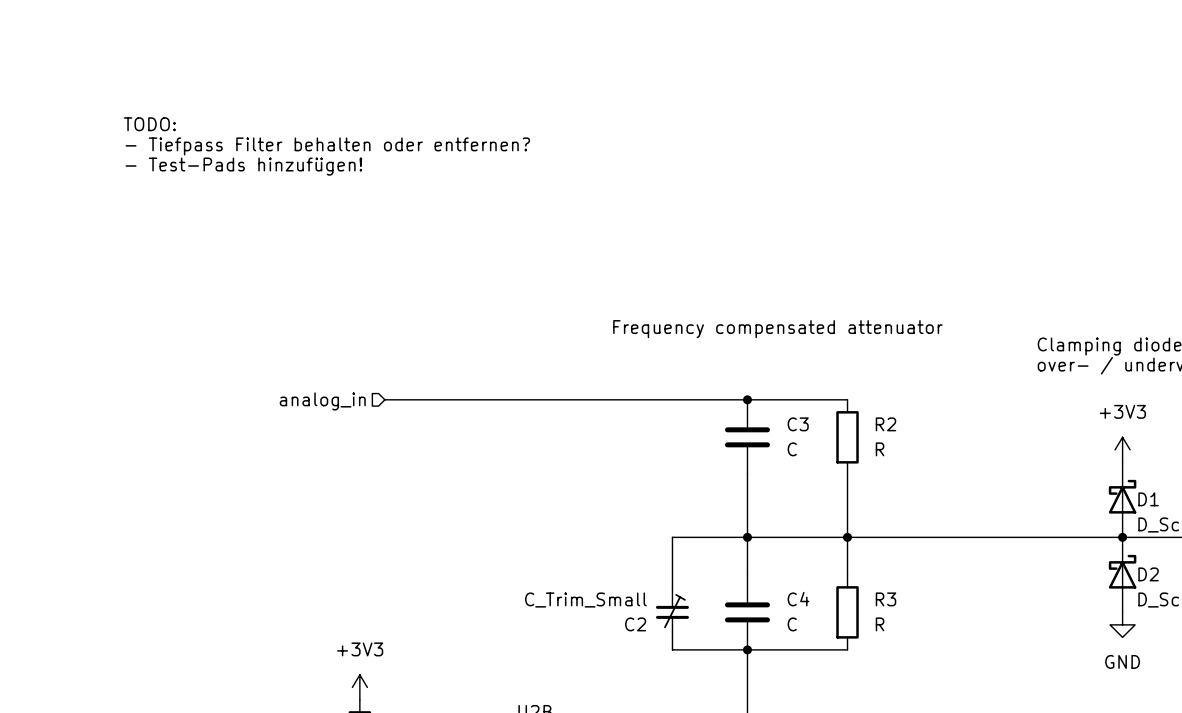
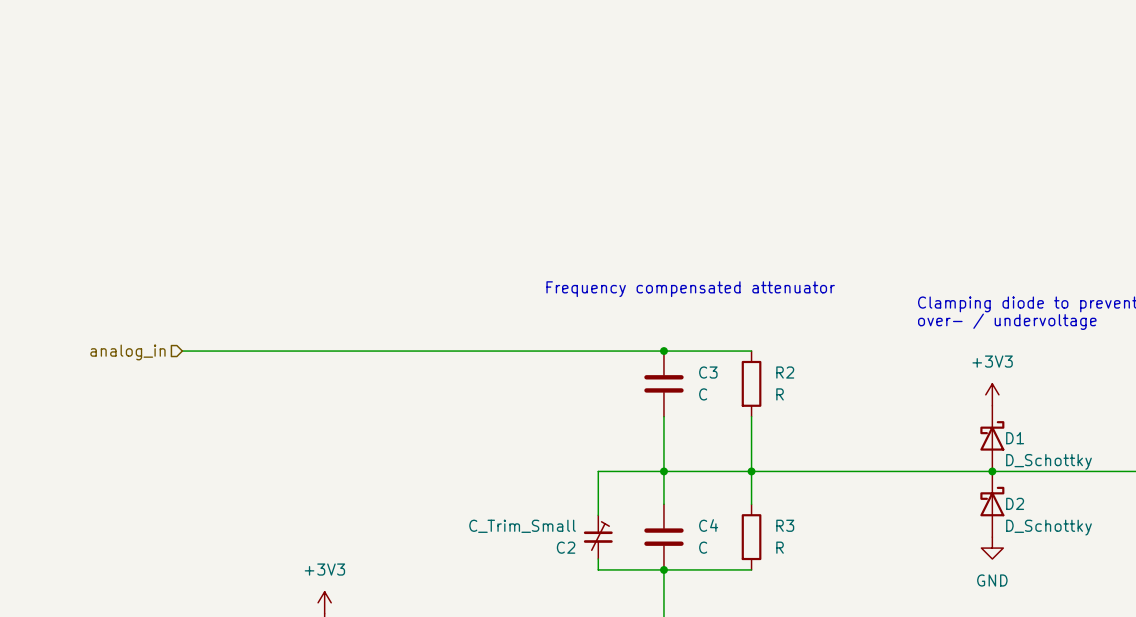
text: TODO: (149, 124) -> none
text: - Tiefpass Filter behalten oder entfernen? (327, 146) -> none
text: - Test-Pads hinzufügen! (243, 166) -> none
wire: none -> (182, 351) (346, 351)
hierarchical label position: analog_in (322, 401) -> analog_in (127, 352)

